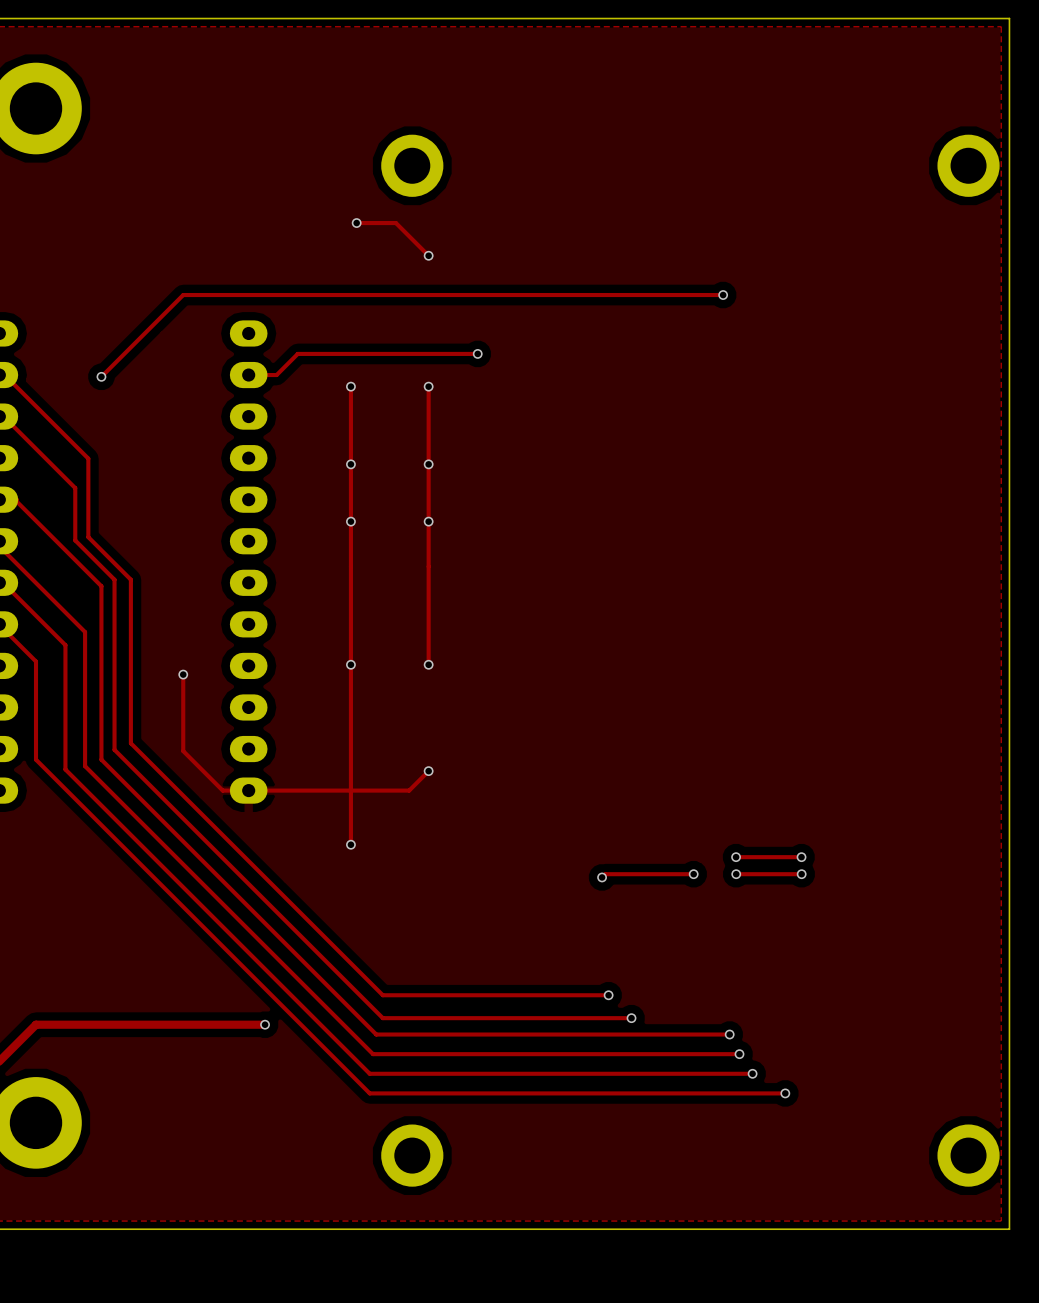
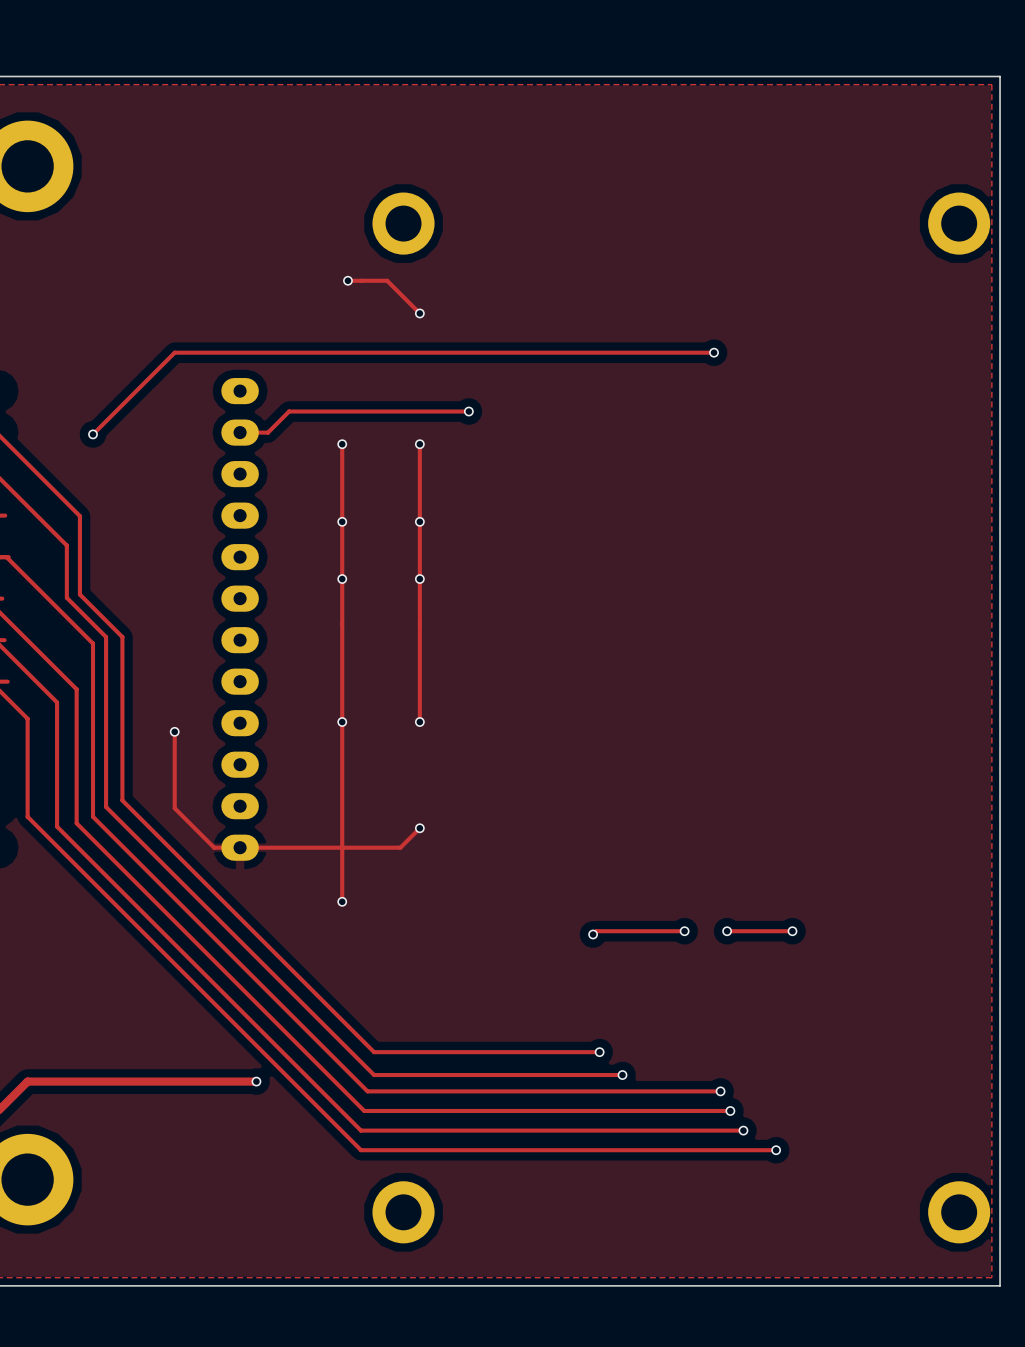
track: (736, 857) (801, 857) -> none
via: (736, 857) -> none
via: (801, 857) -> none

